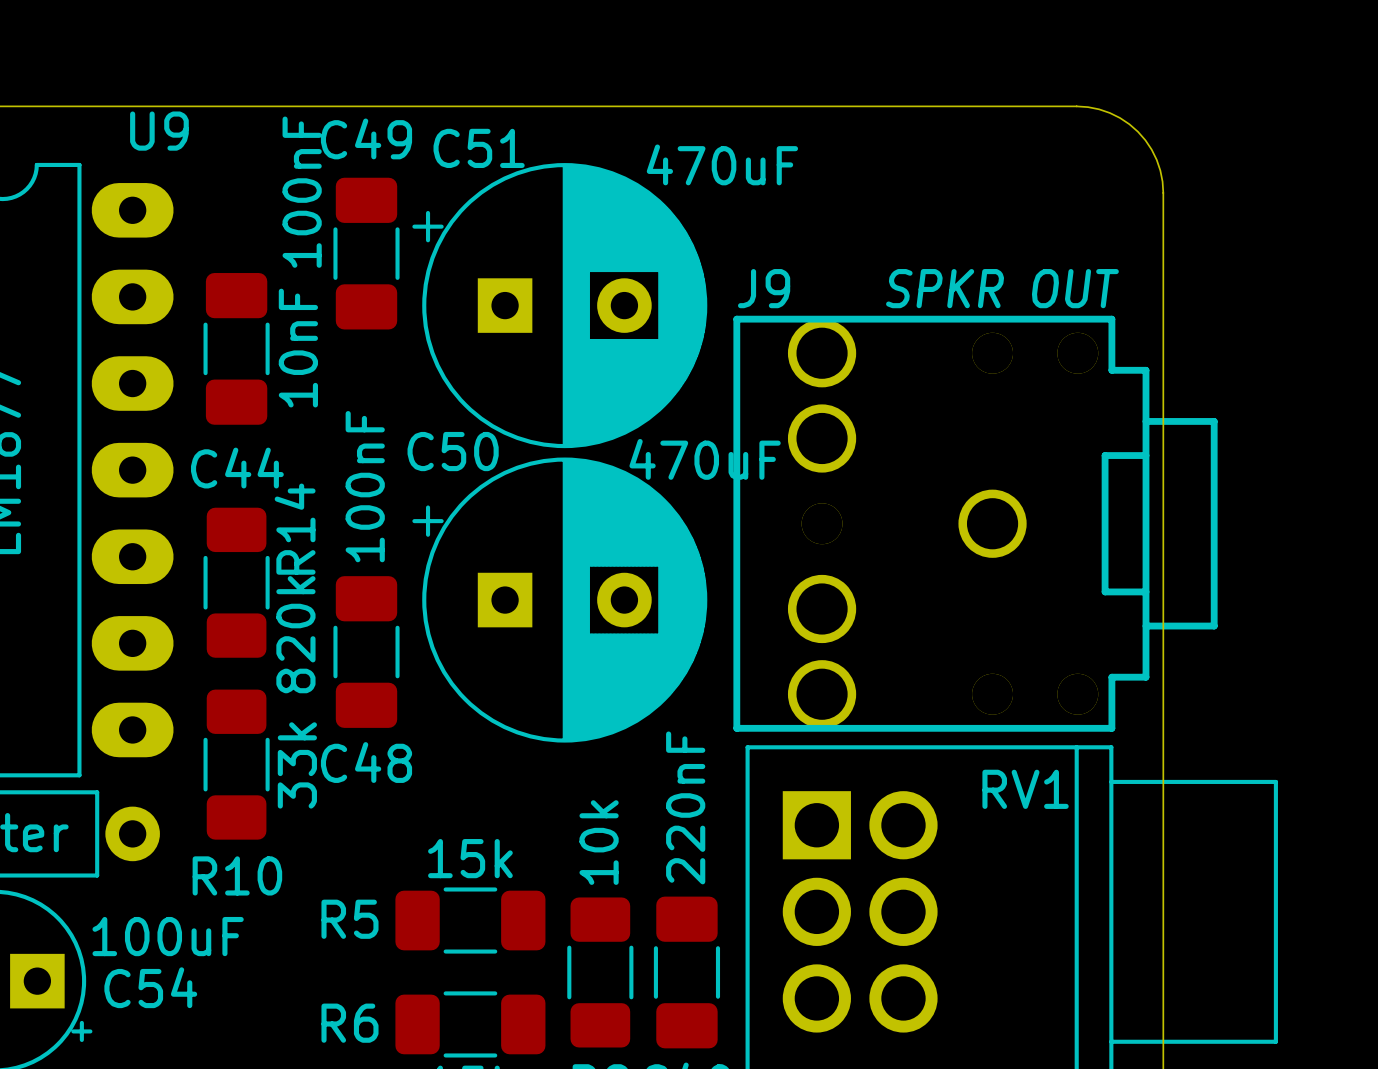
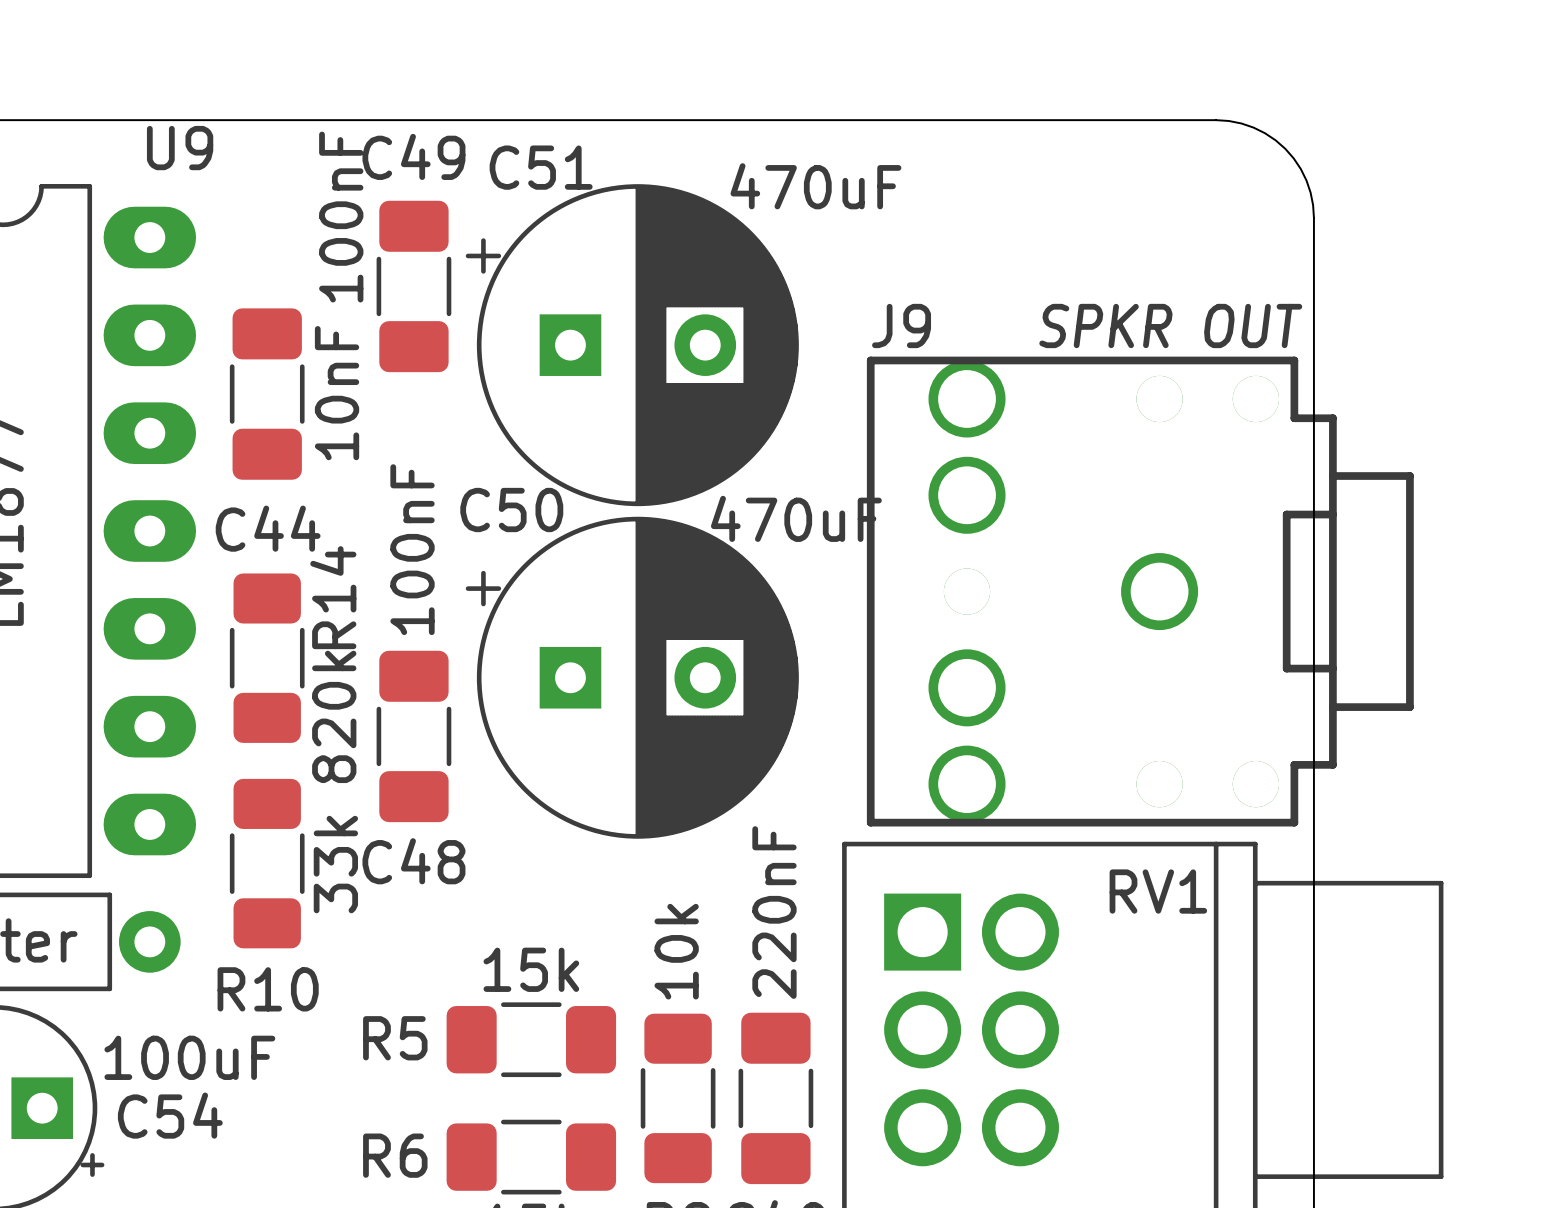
J9 position: (975, 523) -> (1140, 591)

